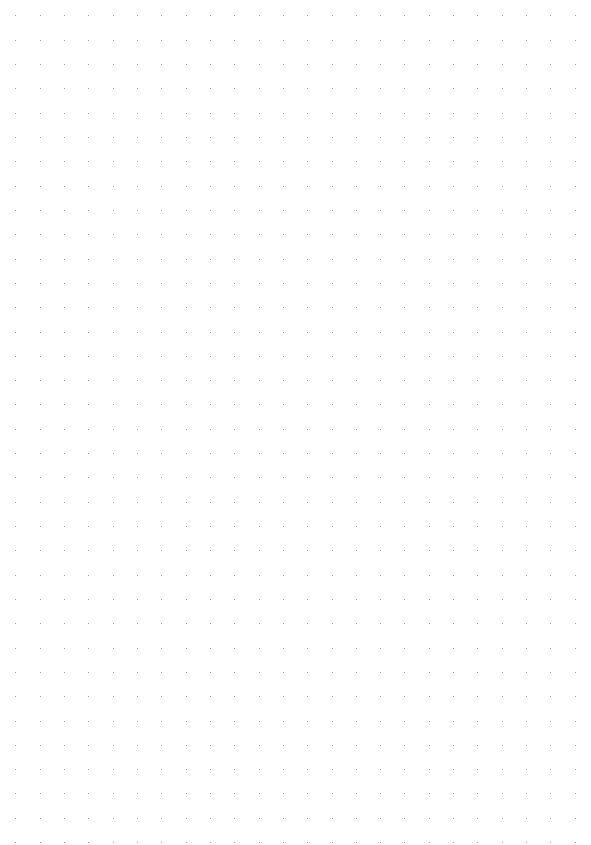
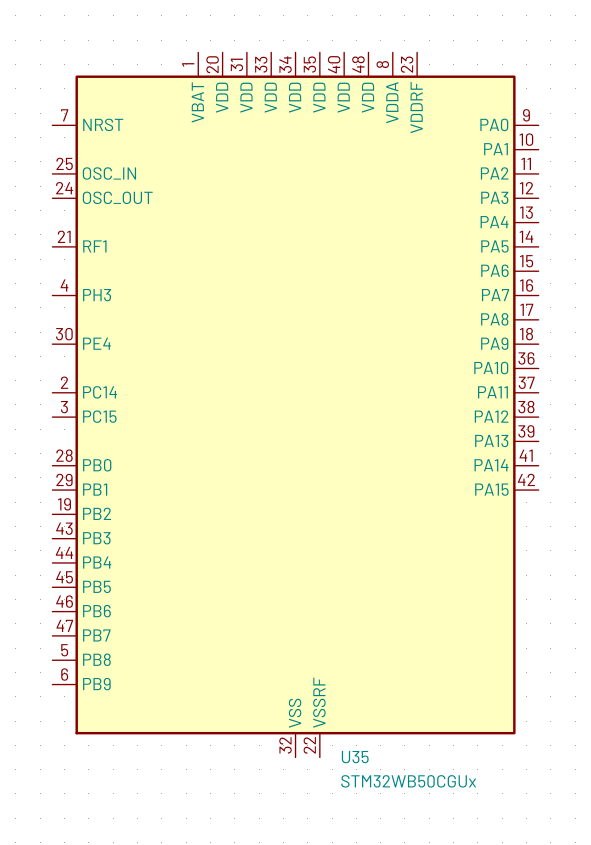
U35: none -> STM32WB50CGUx (295, 404)

